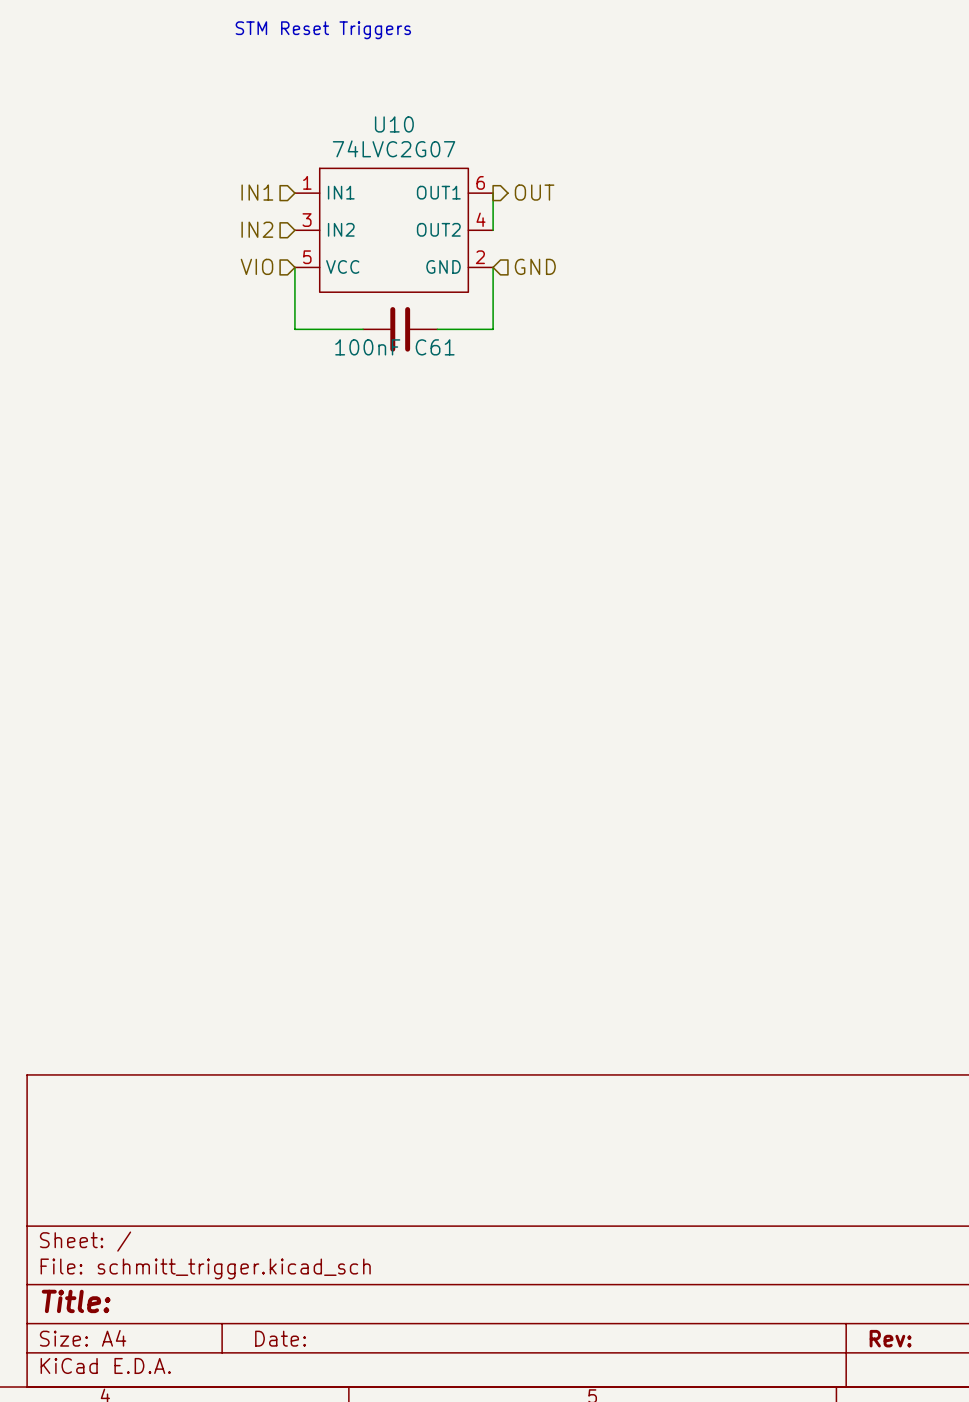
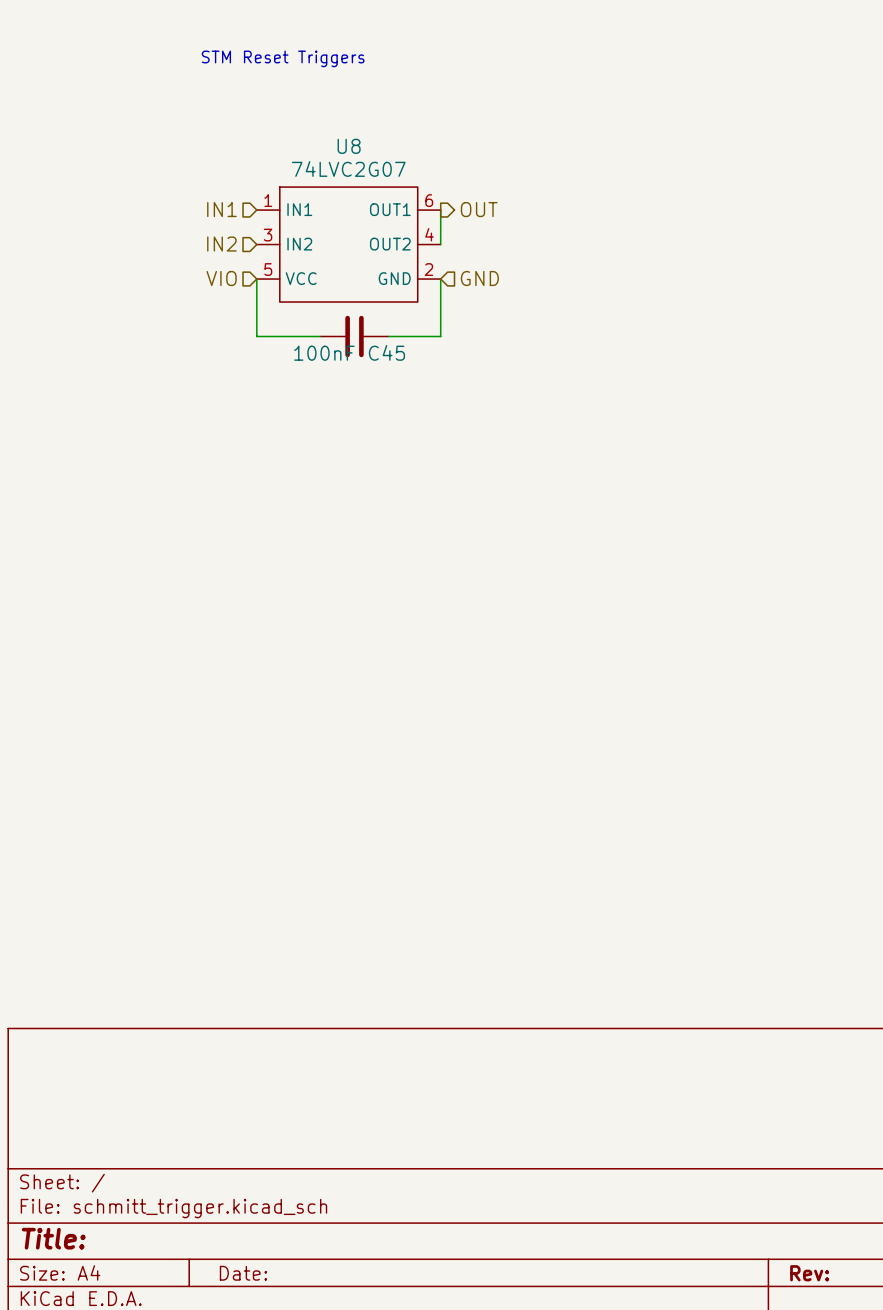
U10 name: U10 (394, 124) -> U8 (349, 146)
C61 name: C61 (435, 347) -> C45 (386, 352)

